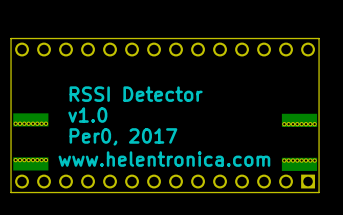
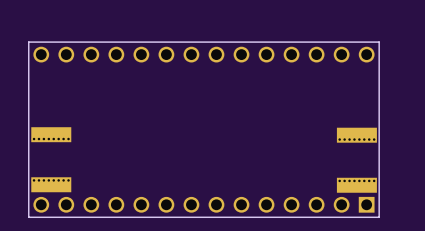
text: RSSI Detector (136, 94) -> none
text: v1.0 (87, 115) -> none
text: Per0, 2017 (123, 136) -> none
text: www.helentronica.com (164, 159) -> none

